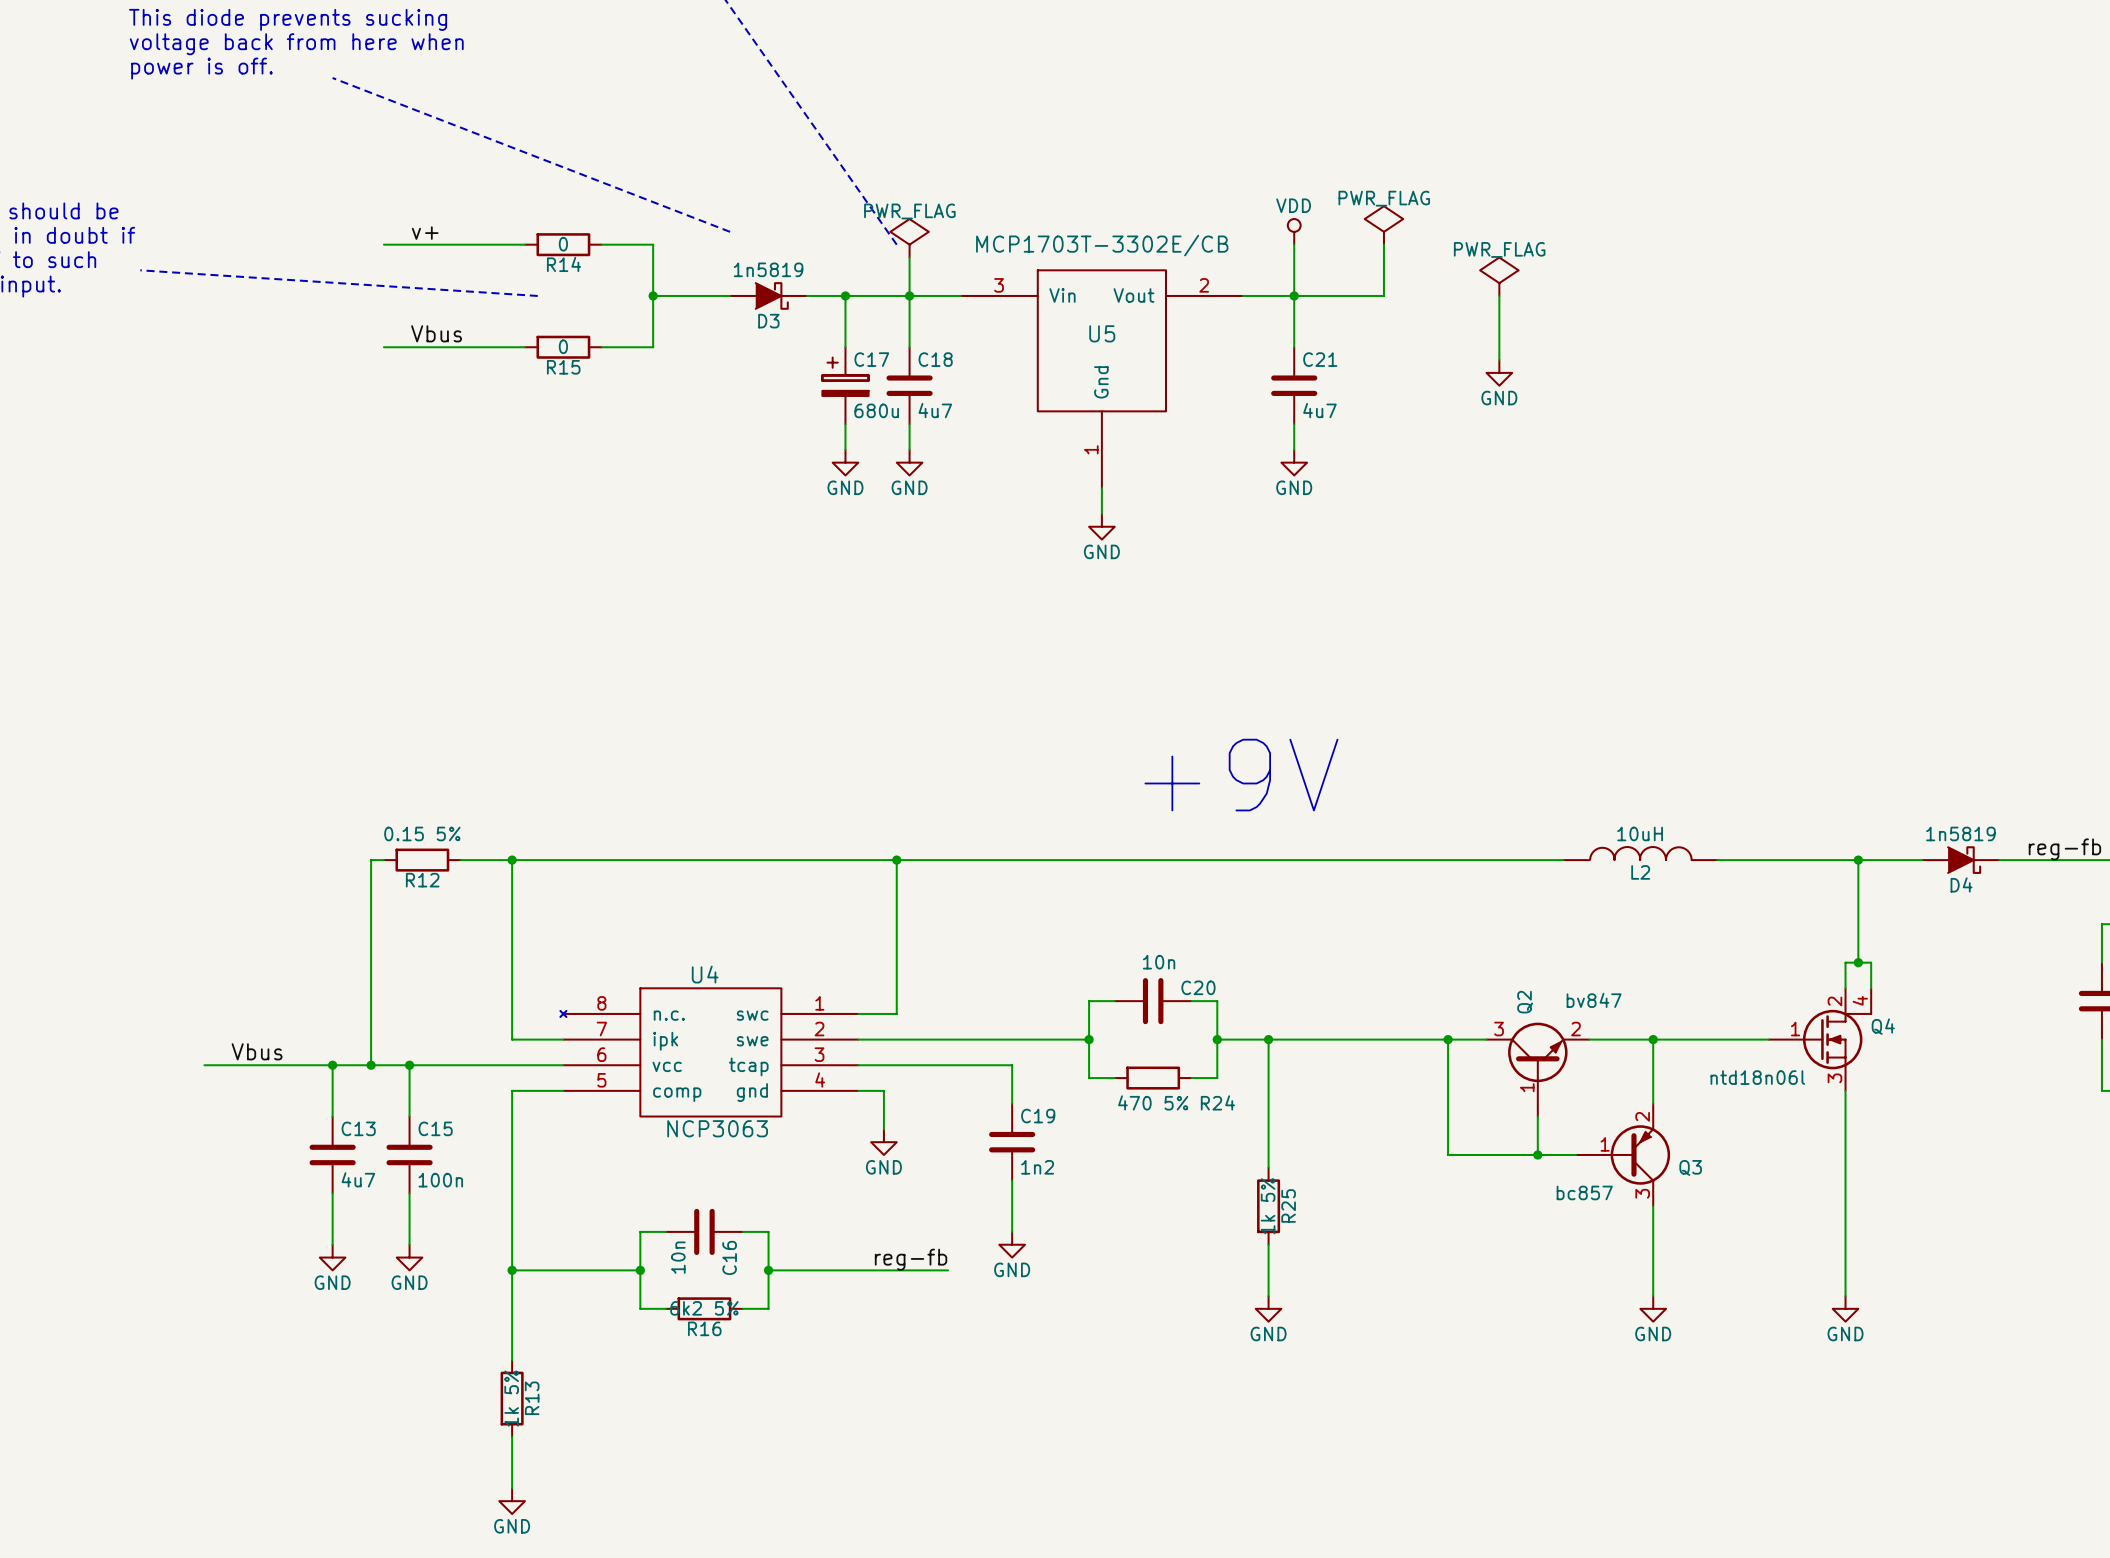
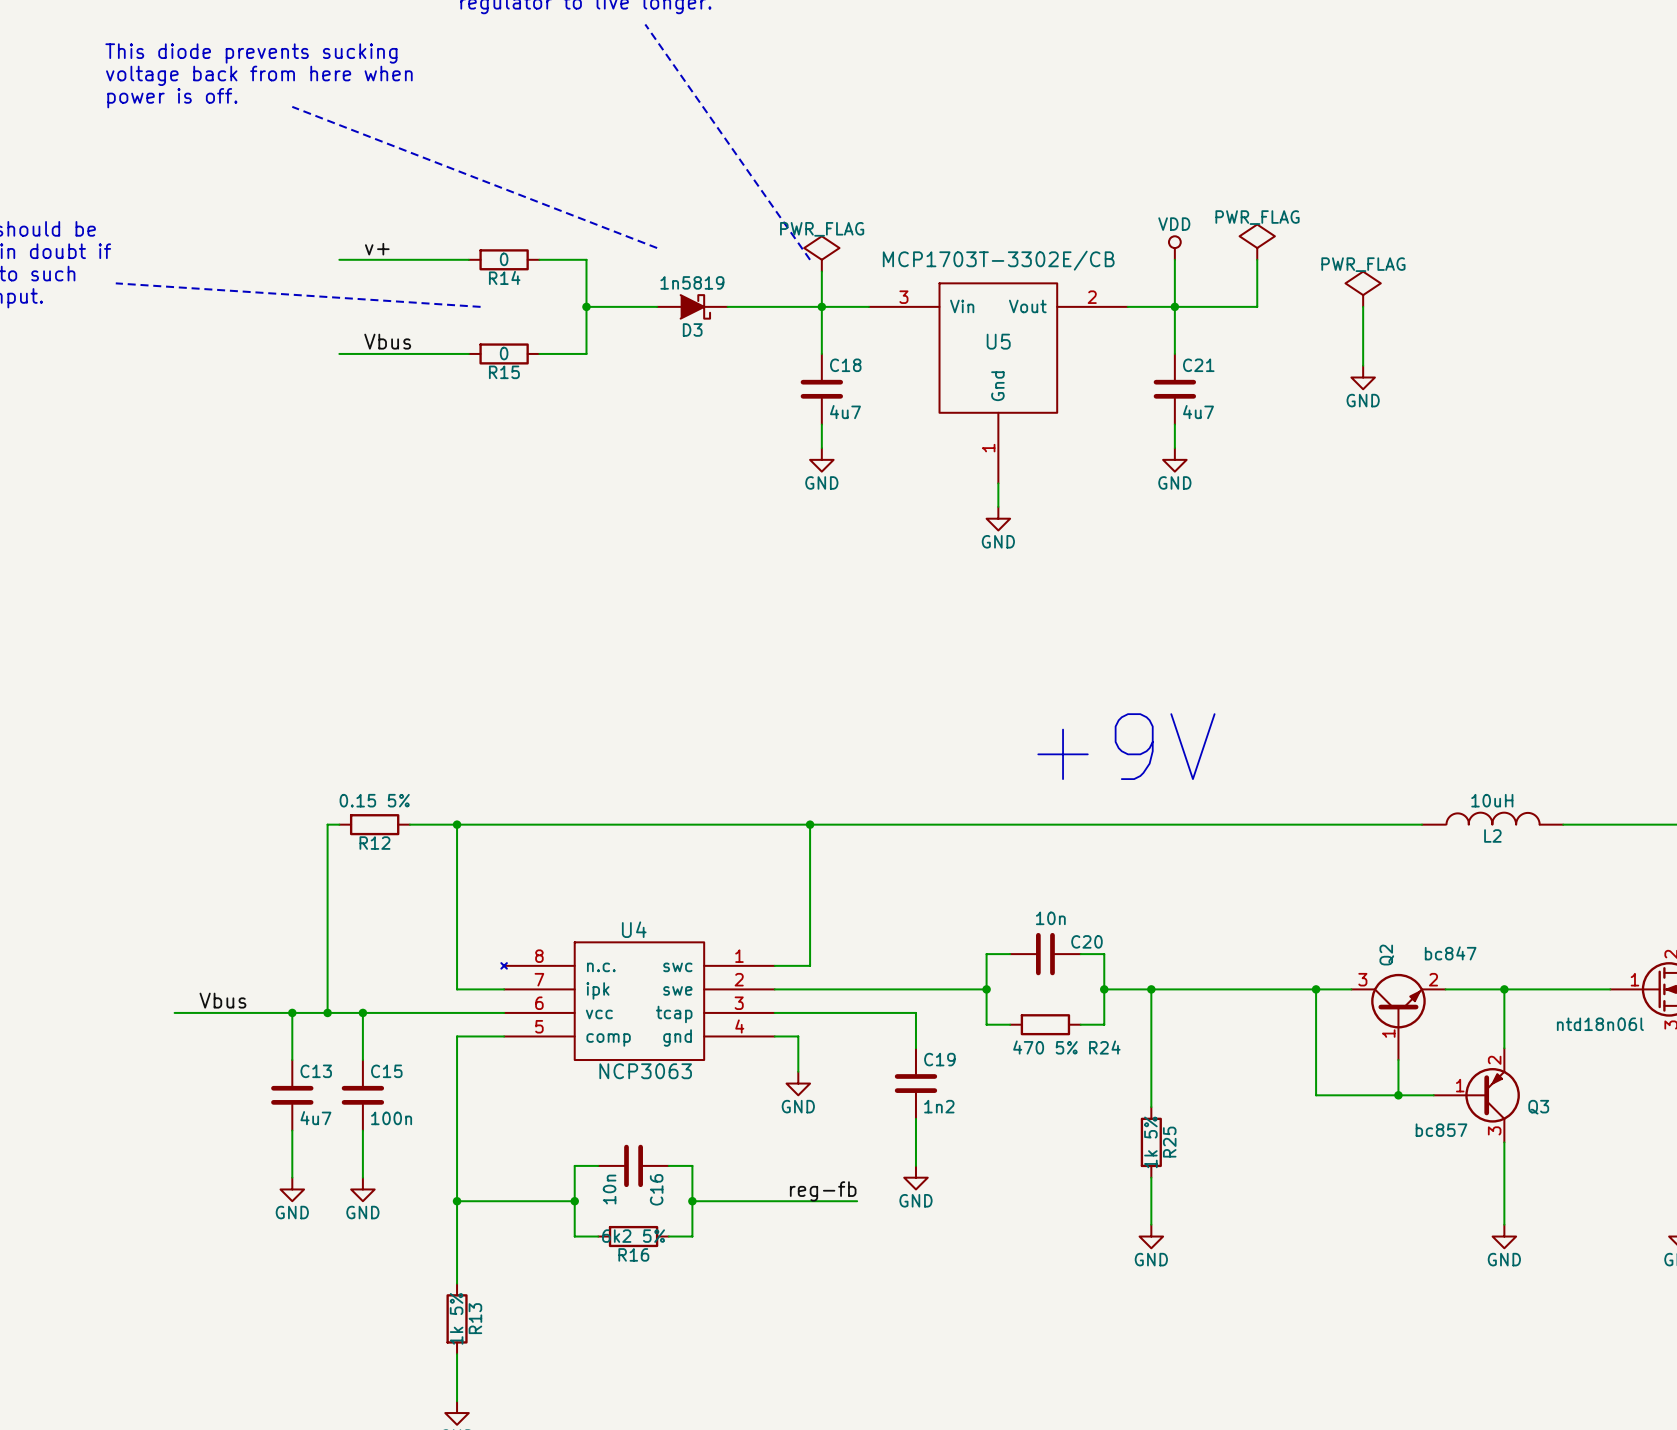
wire: (845, 295) (845, 347) -> none
junction: (845, 295) -> none
C17: 680u (845, 385) -> none
wire: (845, 424) (845, 449) -> none
power symbol: GND (845, 462) -> none
Q2 value: bv847 (1594, 1000) -> bc847 (1450, 953)

